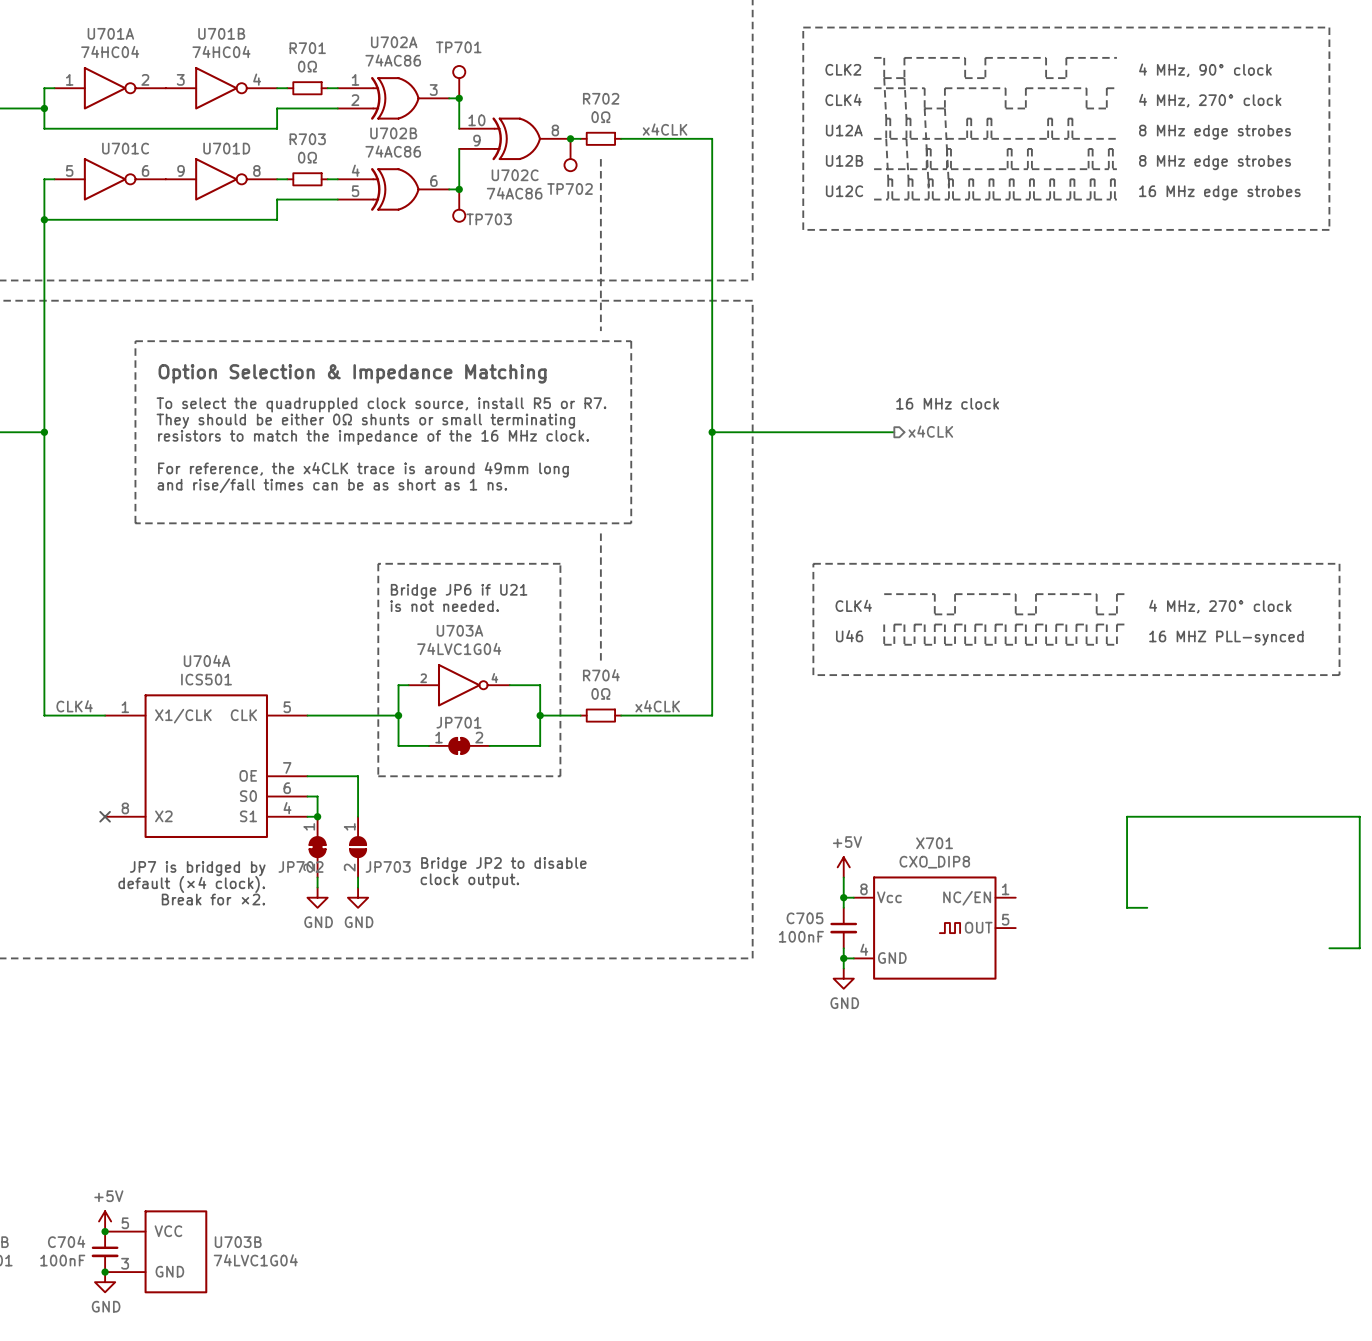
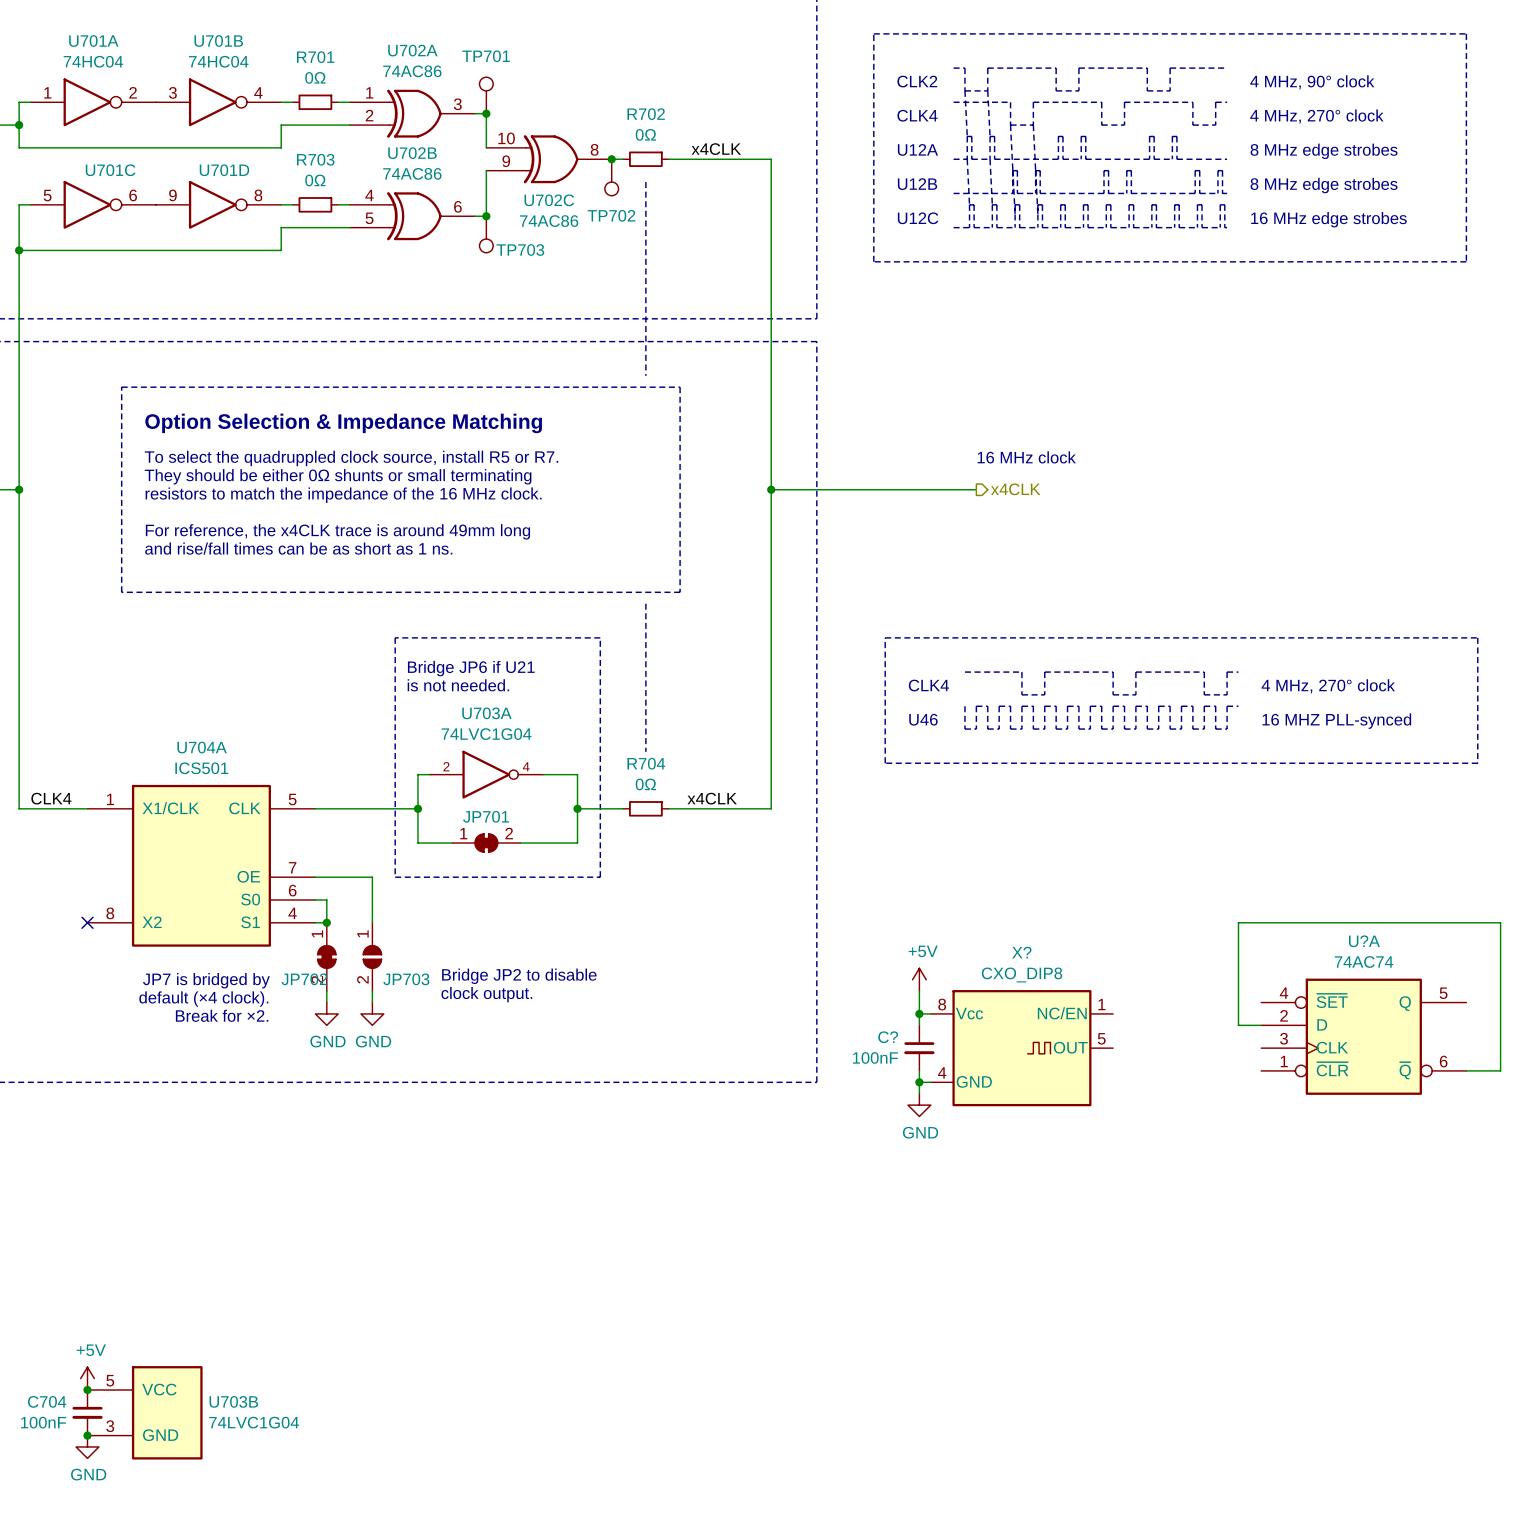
X701 name: X701 (934, 843) -> X? (1021, 952)
U?A: none -> 74AC74 (1363, 1036)
C705 name: C705 (805, 918) -> C? (888, 1037)

